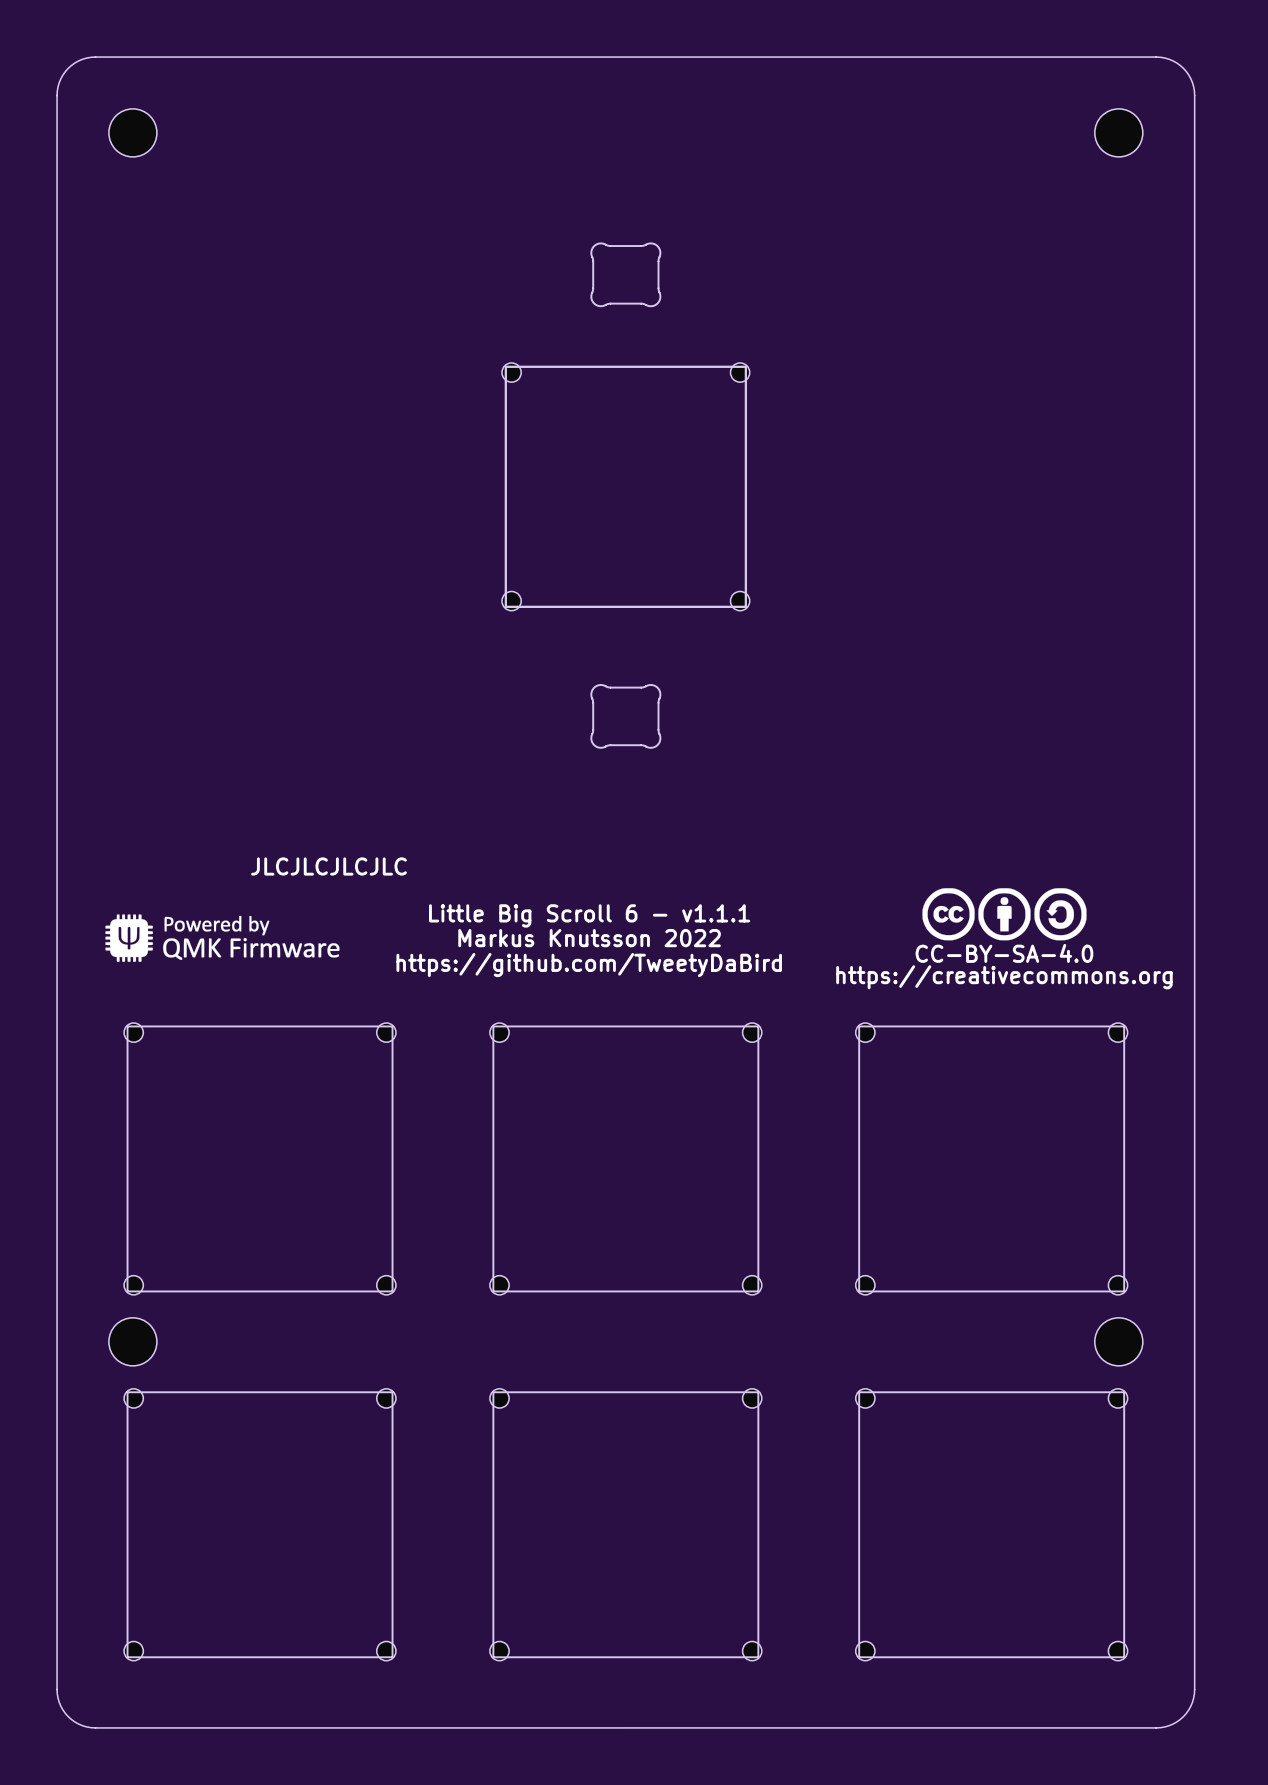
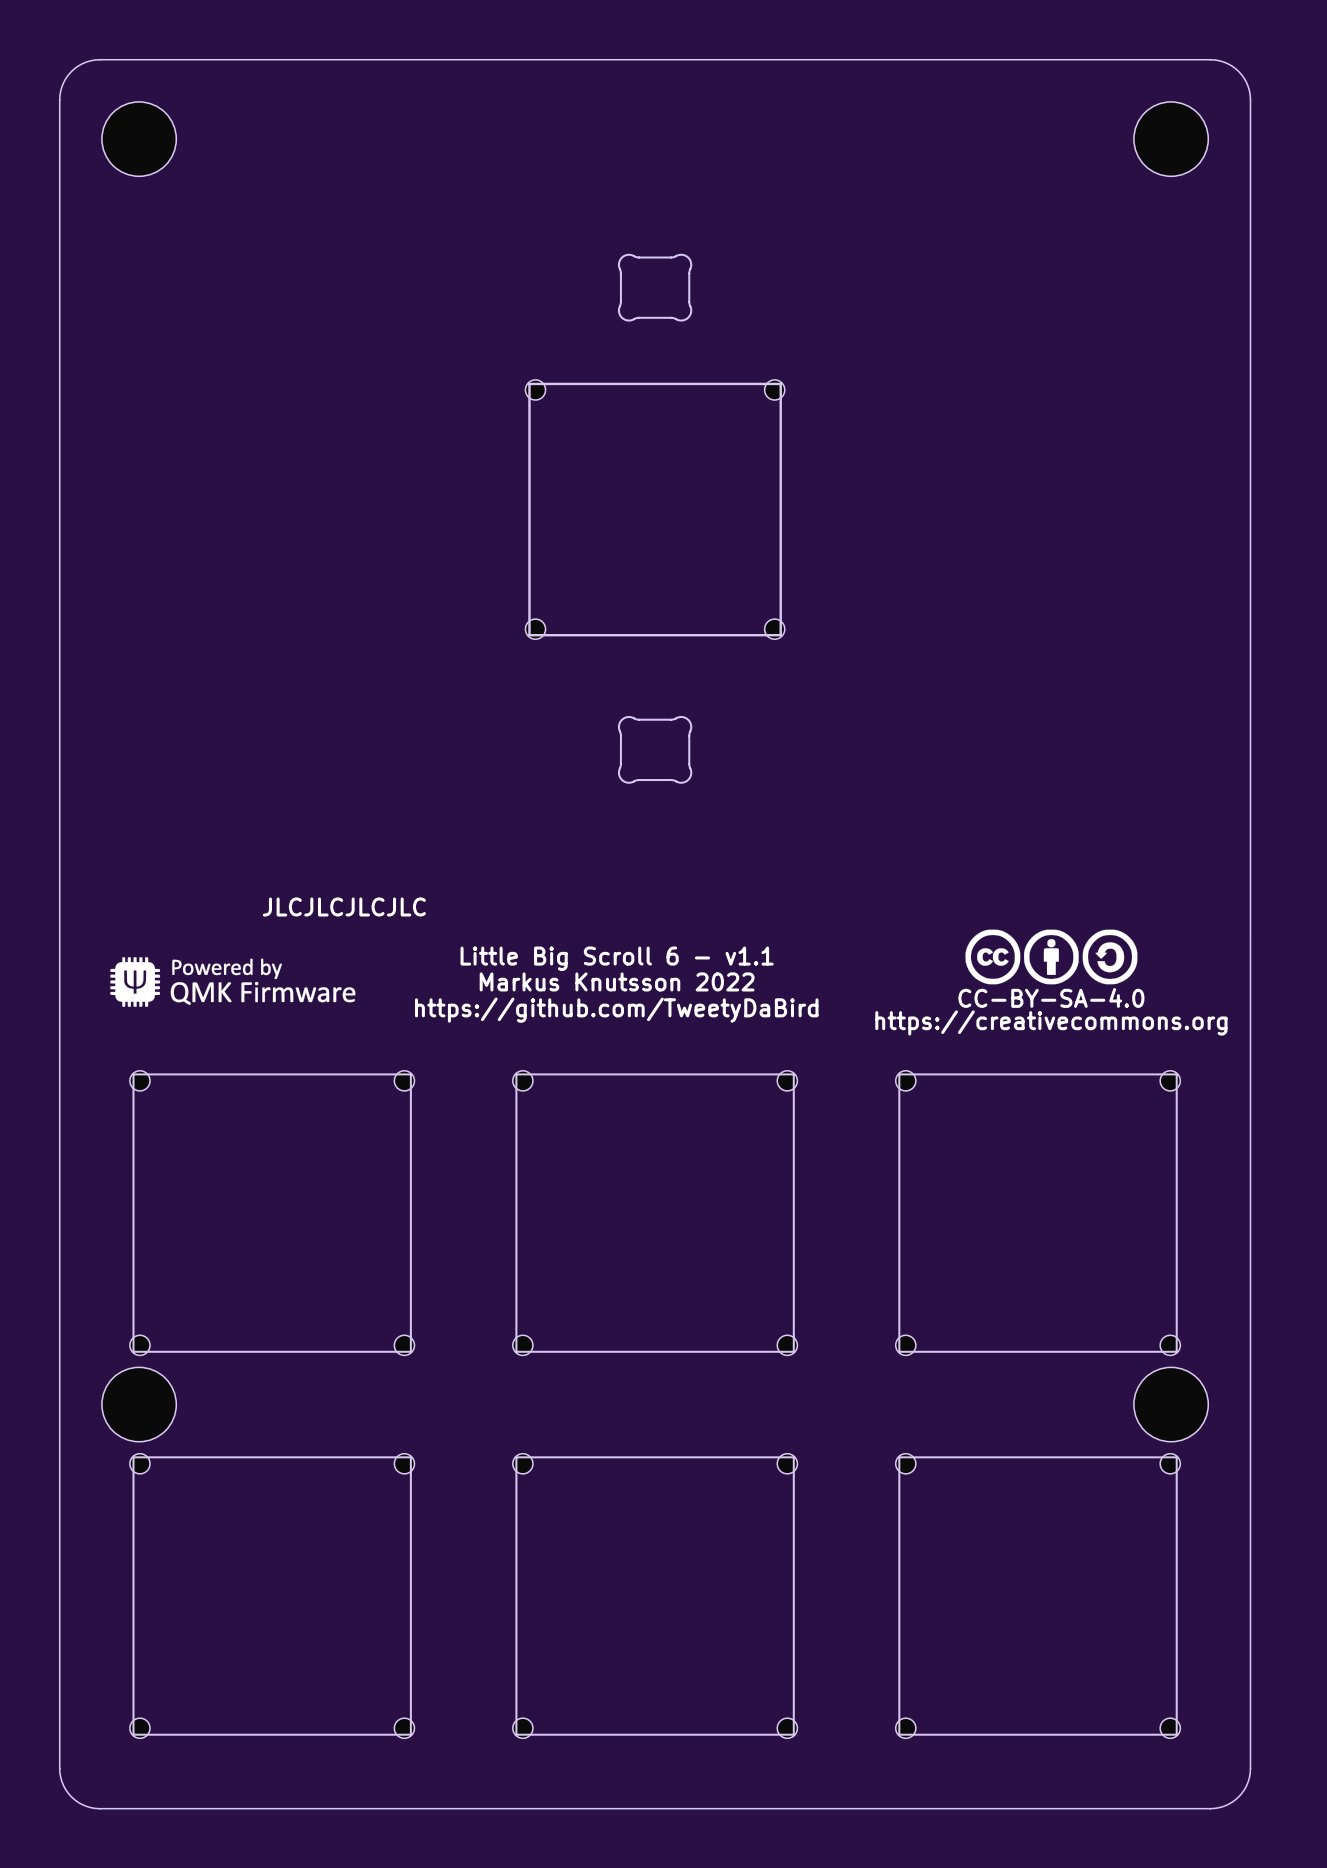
part footprint: [108, 108, 157, 157] -> [101, 101, 177, 177]
part footprint: [1094, 108, 1143, 157] -> [1133, 101, 1209, 177]
text: Little Big Scroll 6 - v1.1.1 (589, 915) -> Little Big Scroll 6 - v1.1 (617, 958)
part footprint: [108, 1317, 157, 1366] -> [101, 1367, 177, 1442]
part footprint: [1094, 1317, 1143, 1366] -> [1133, 1367, 1209, 1442]

